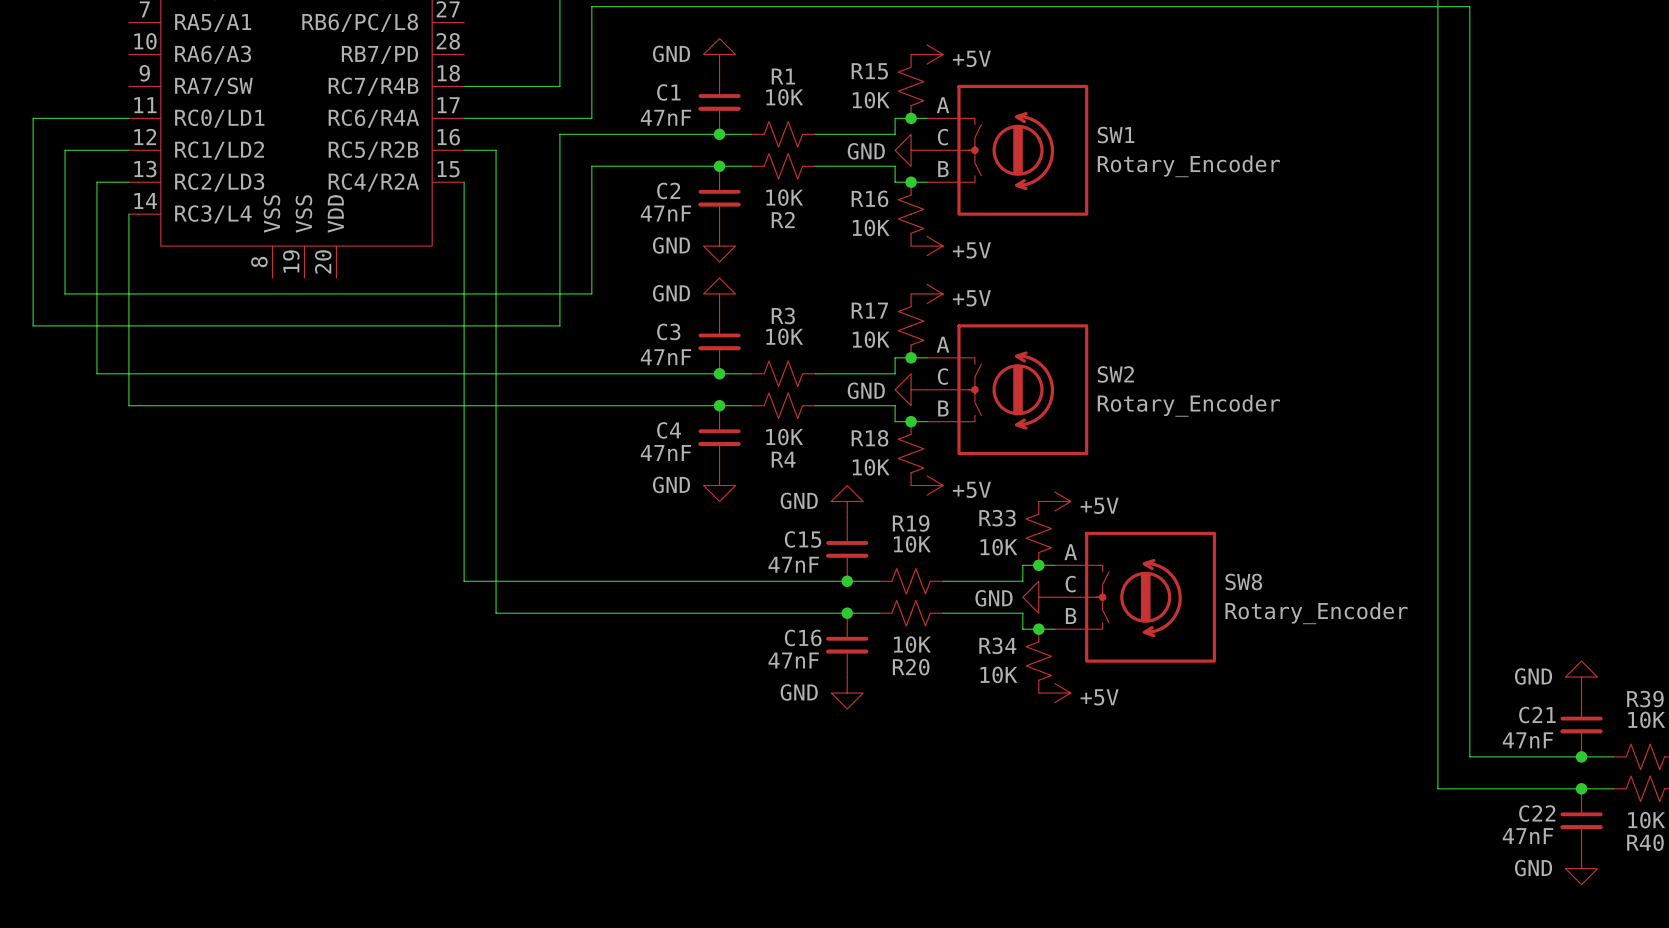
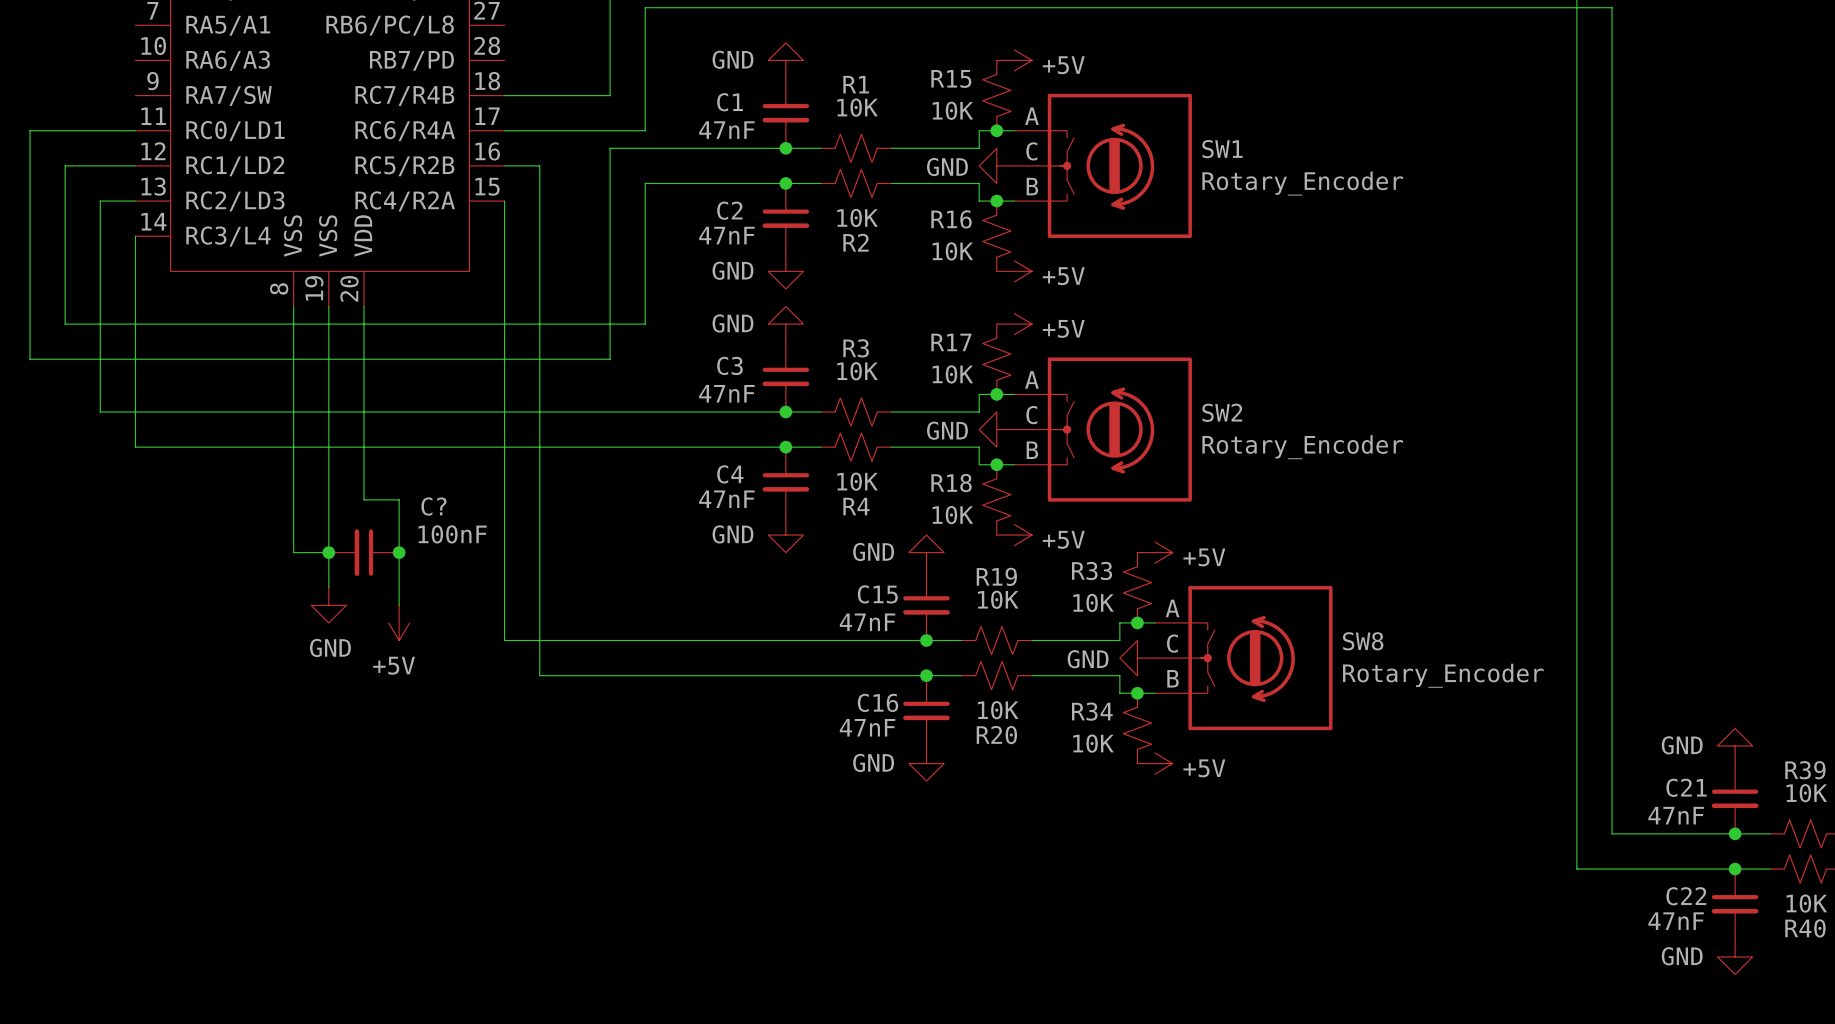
wire: none -> (293, 306) (293, 552) (328, 552)
wire: none -> (328, 306) (328, 587)
wire: none -> (363, 306) (363, 499) (399, 499) (399, 605)
junction: none -> (328, 552)
C?: none -> 100nF (363, 552)
junction: none -> (399, 552)
power symbol: none -> GND (328, 605)
power symbol: none -> +5V (399, 622)

